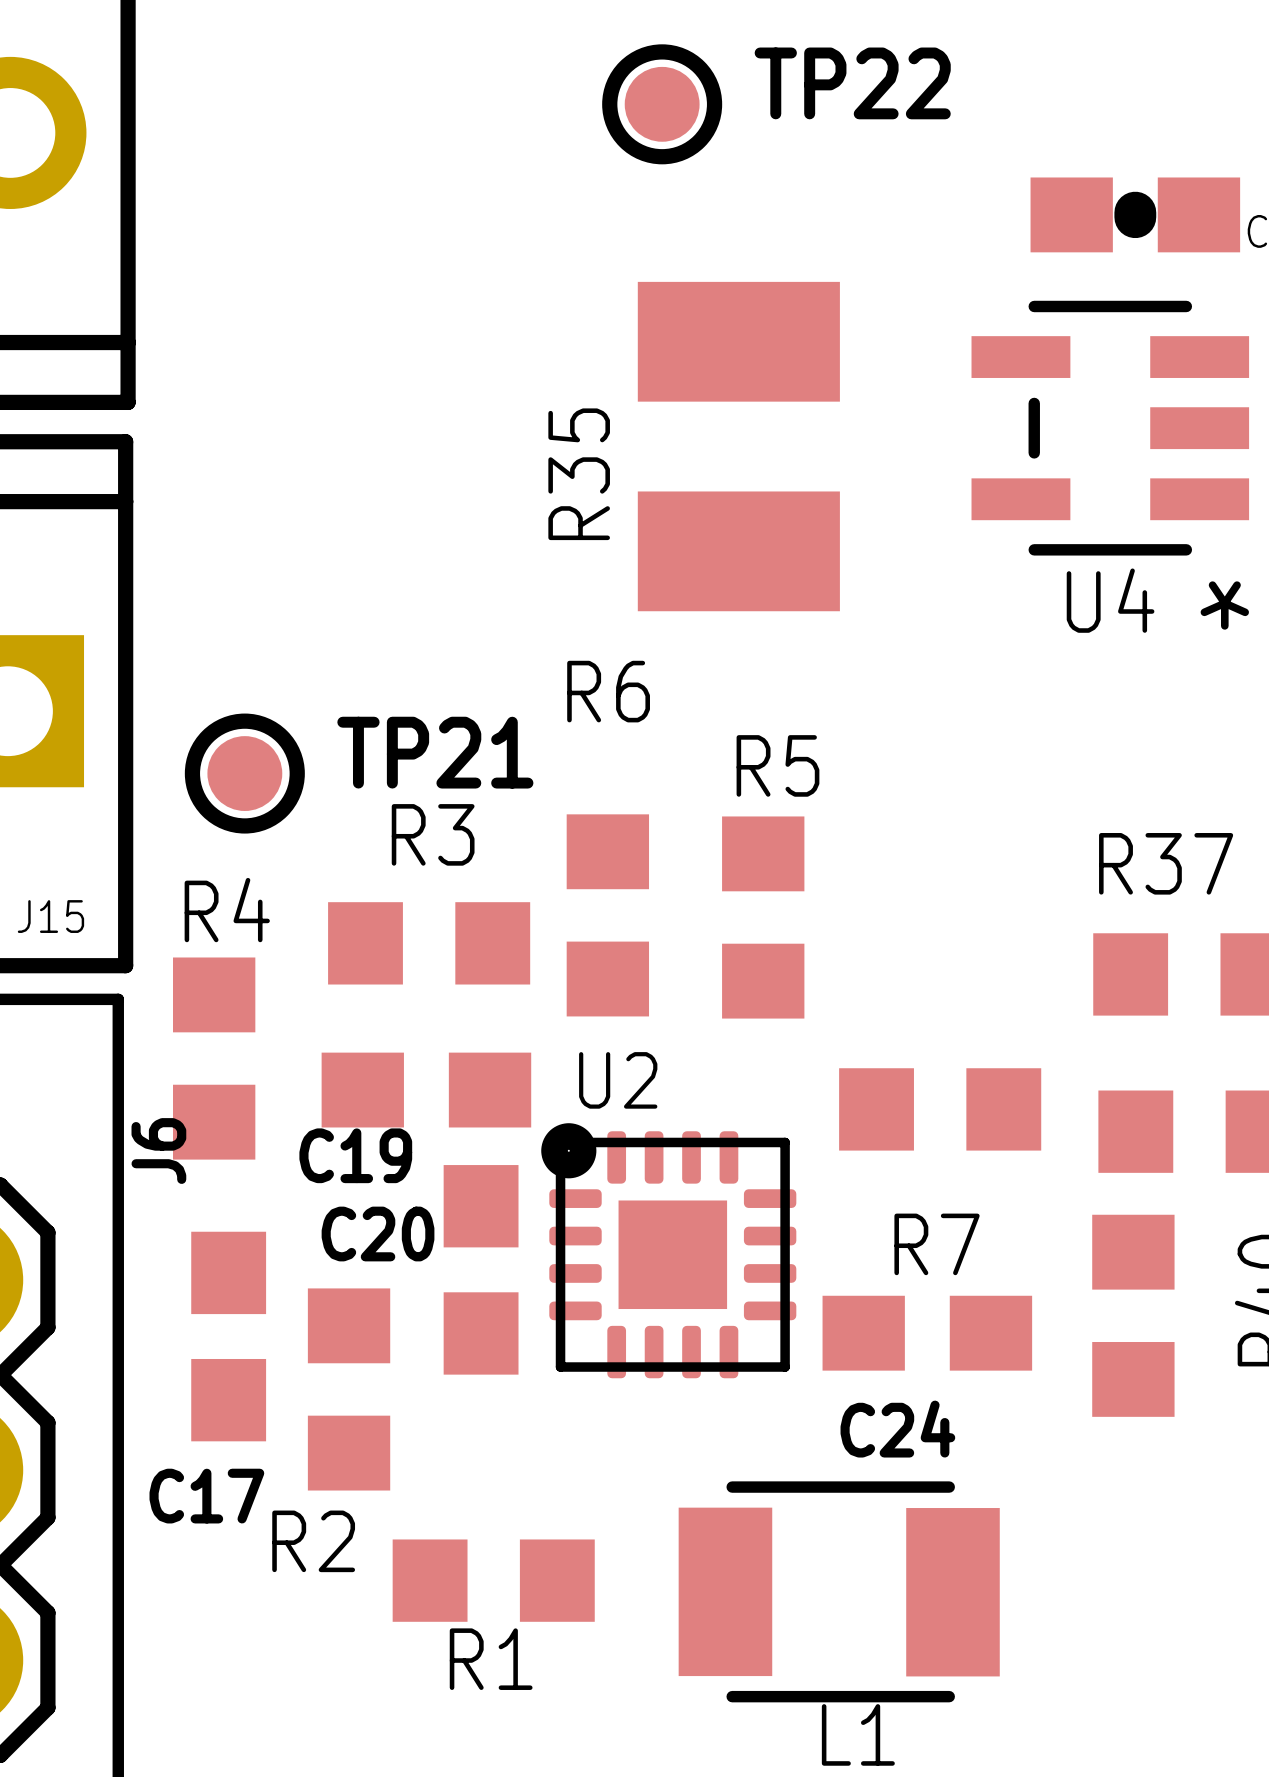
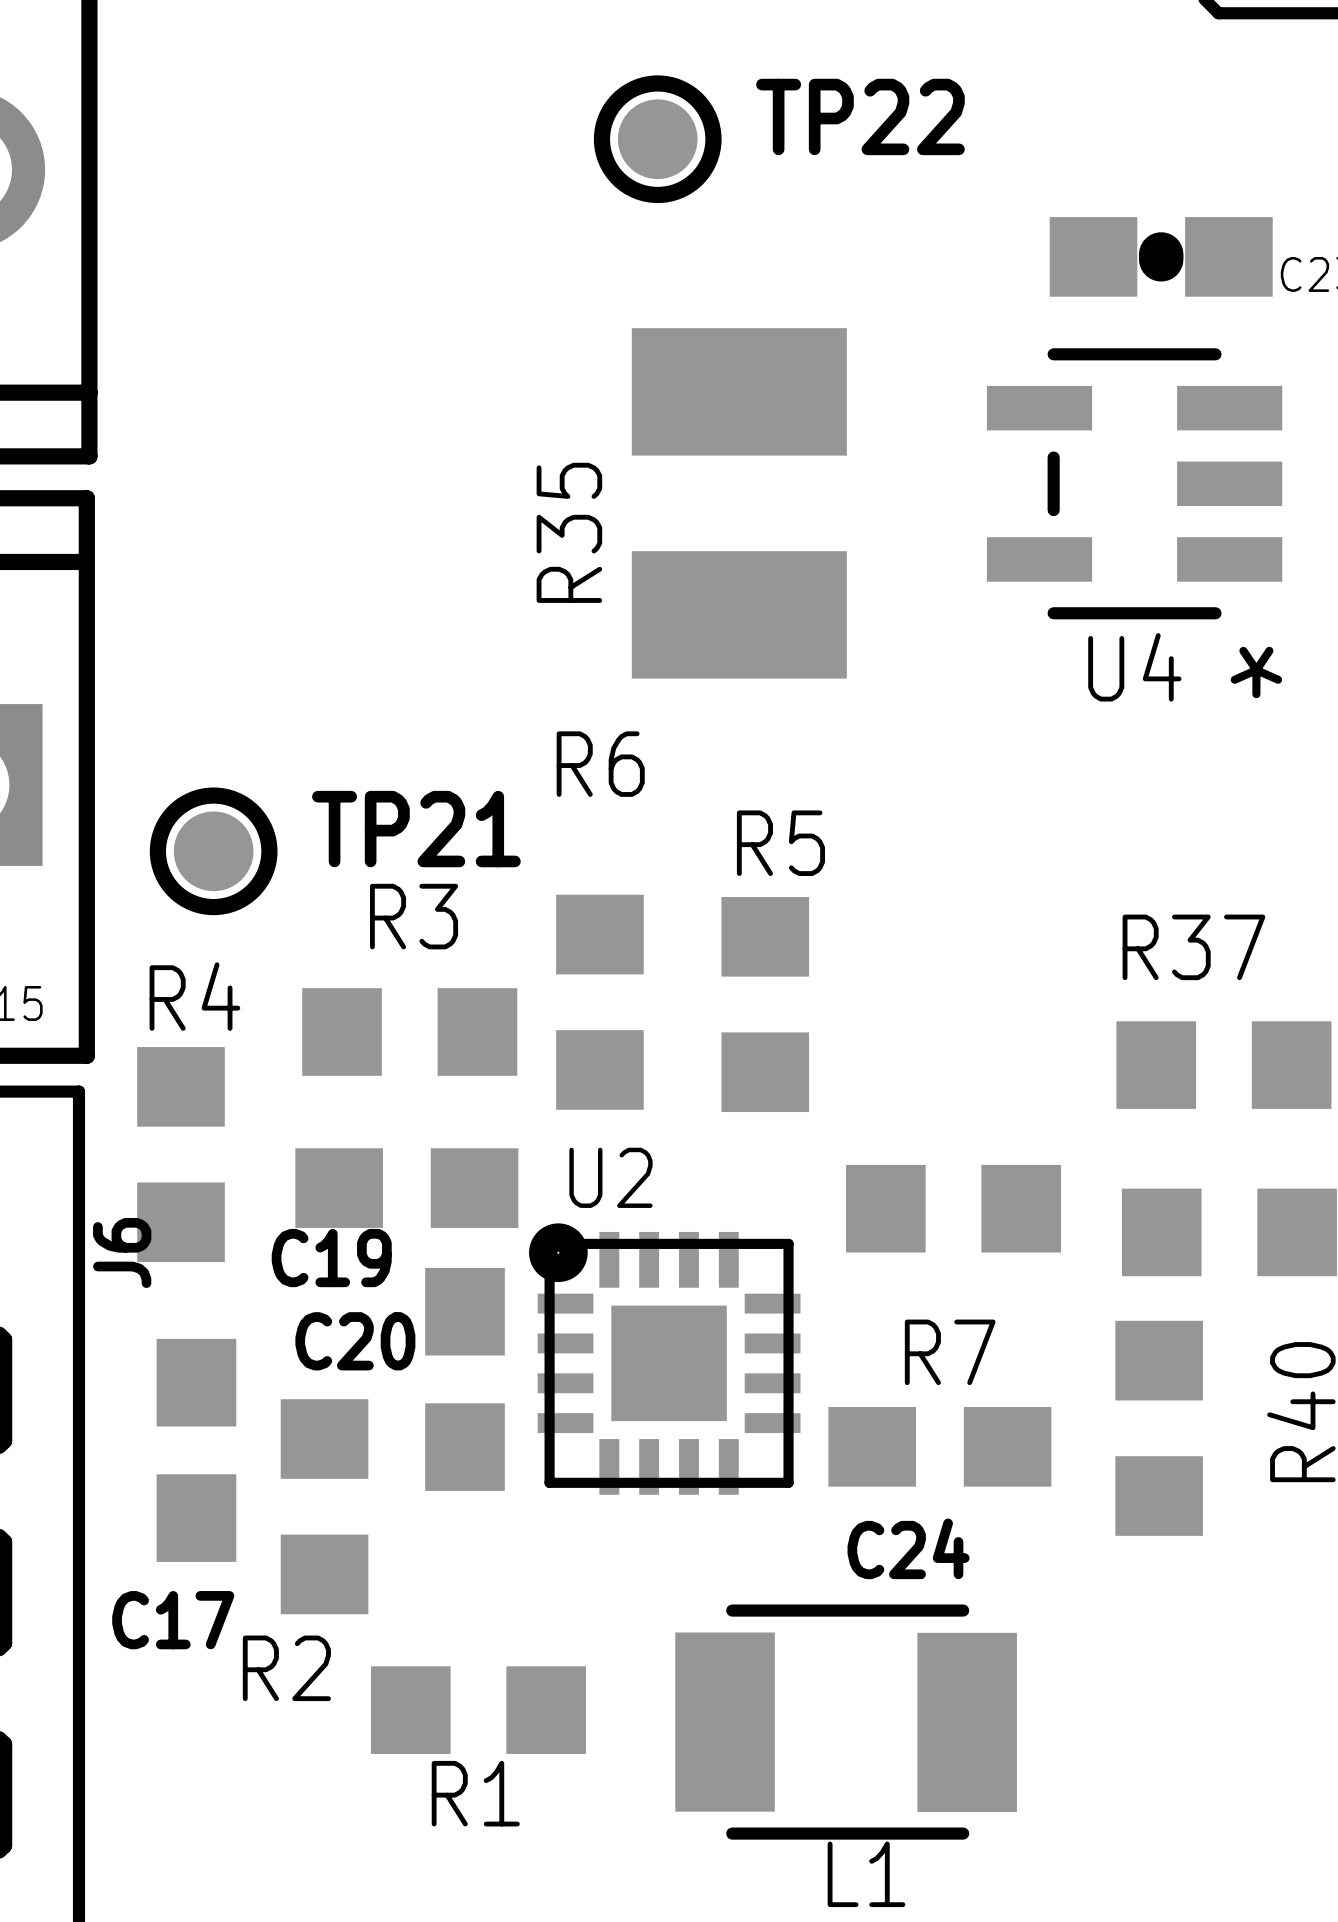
U2 footprint: [541, 1123, 797, 1379] -> [529, 1223, 801, 1495]

